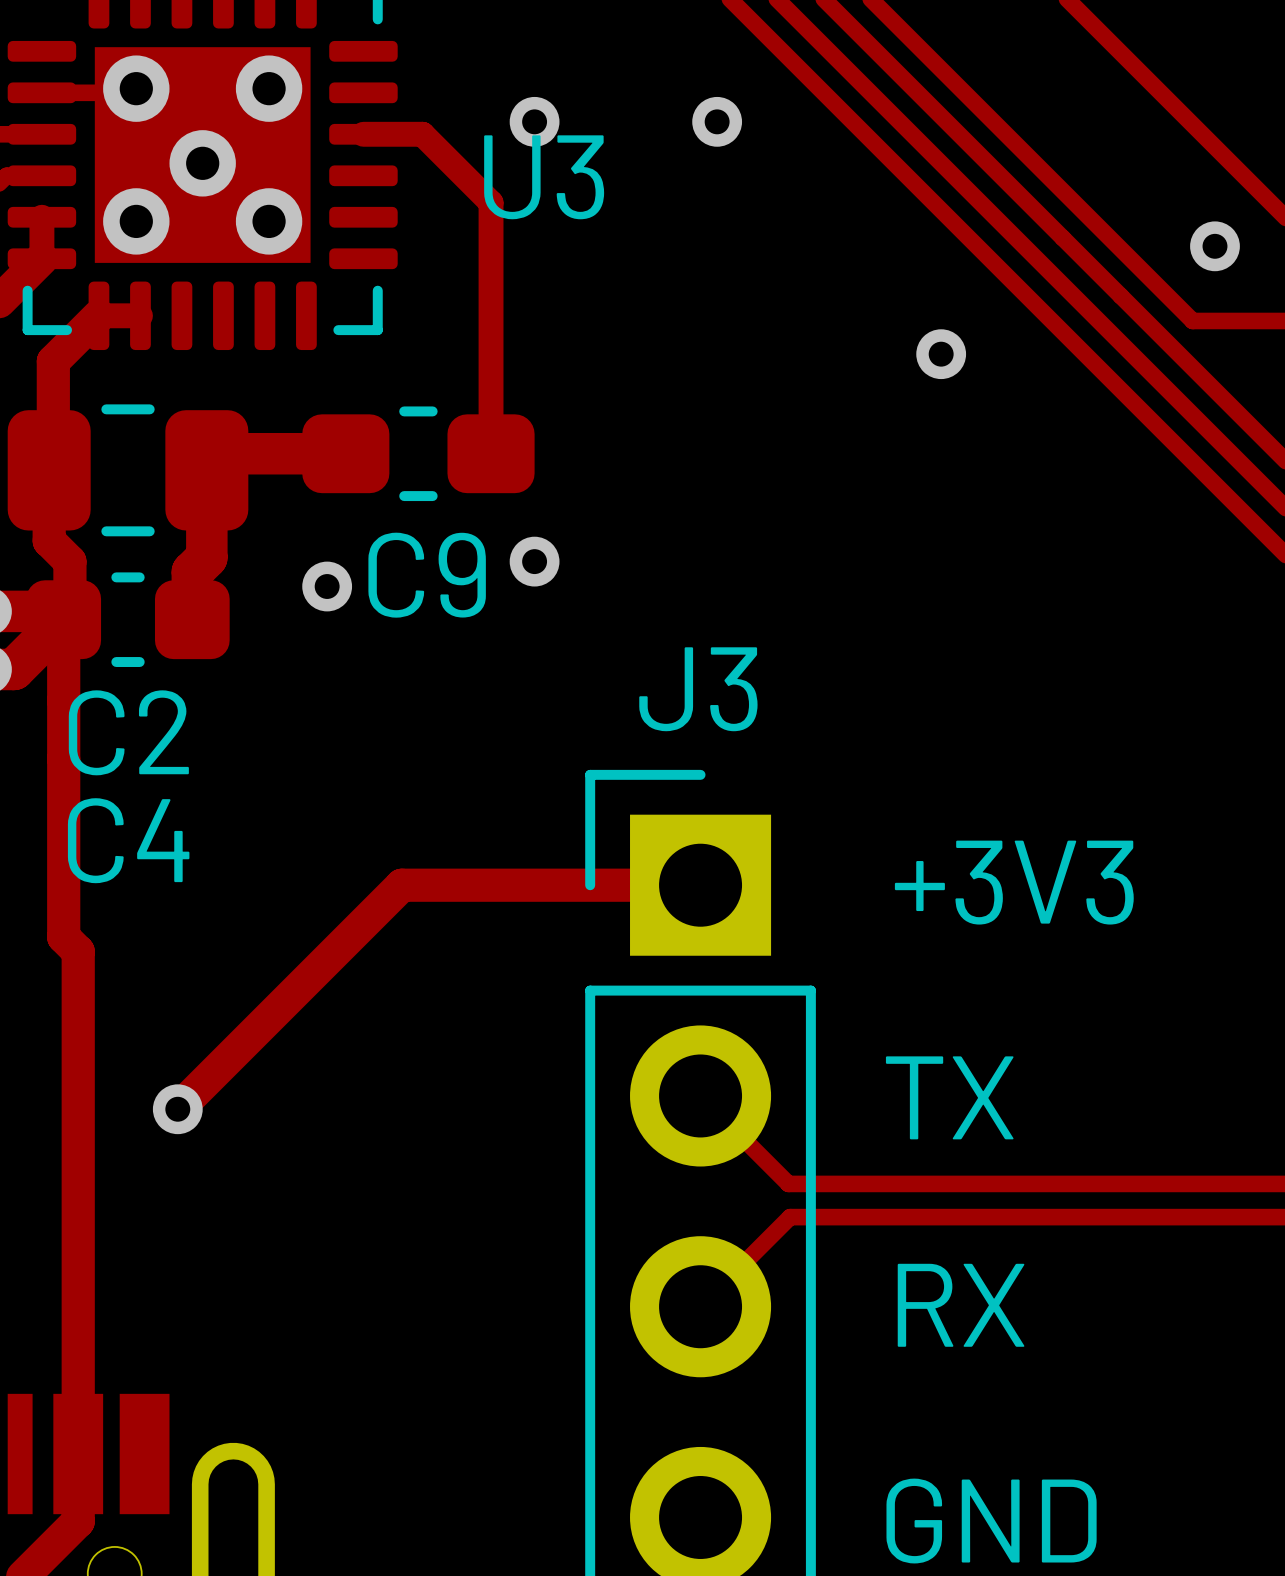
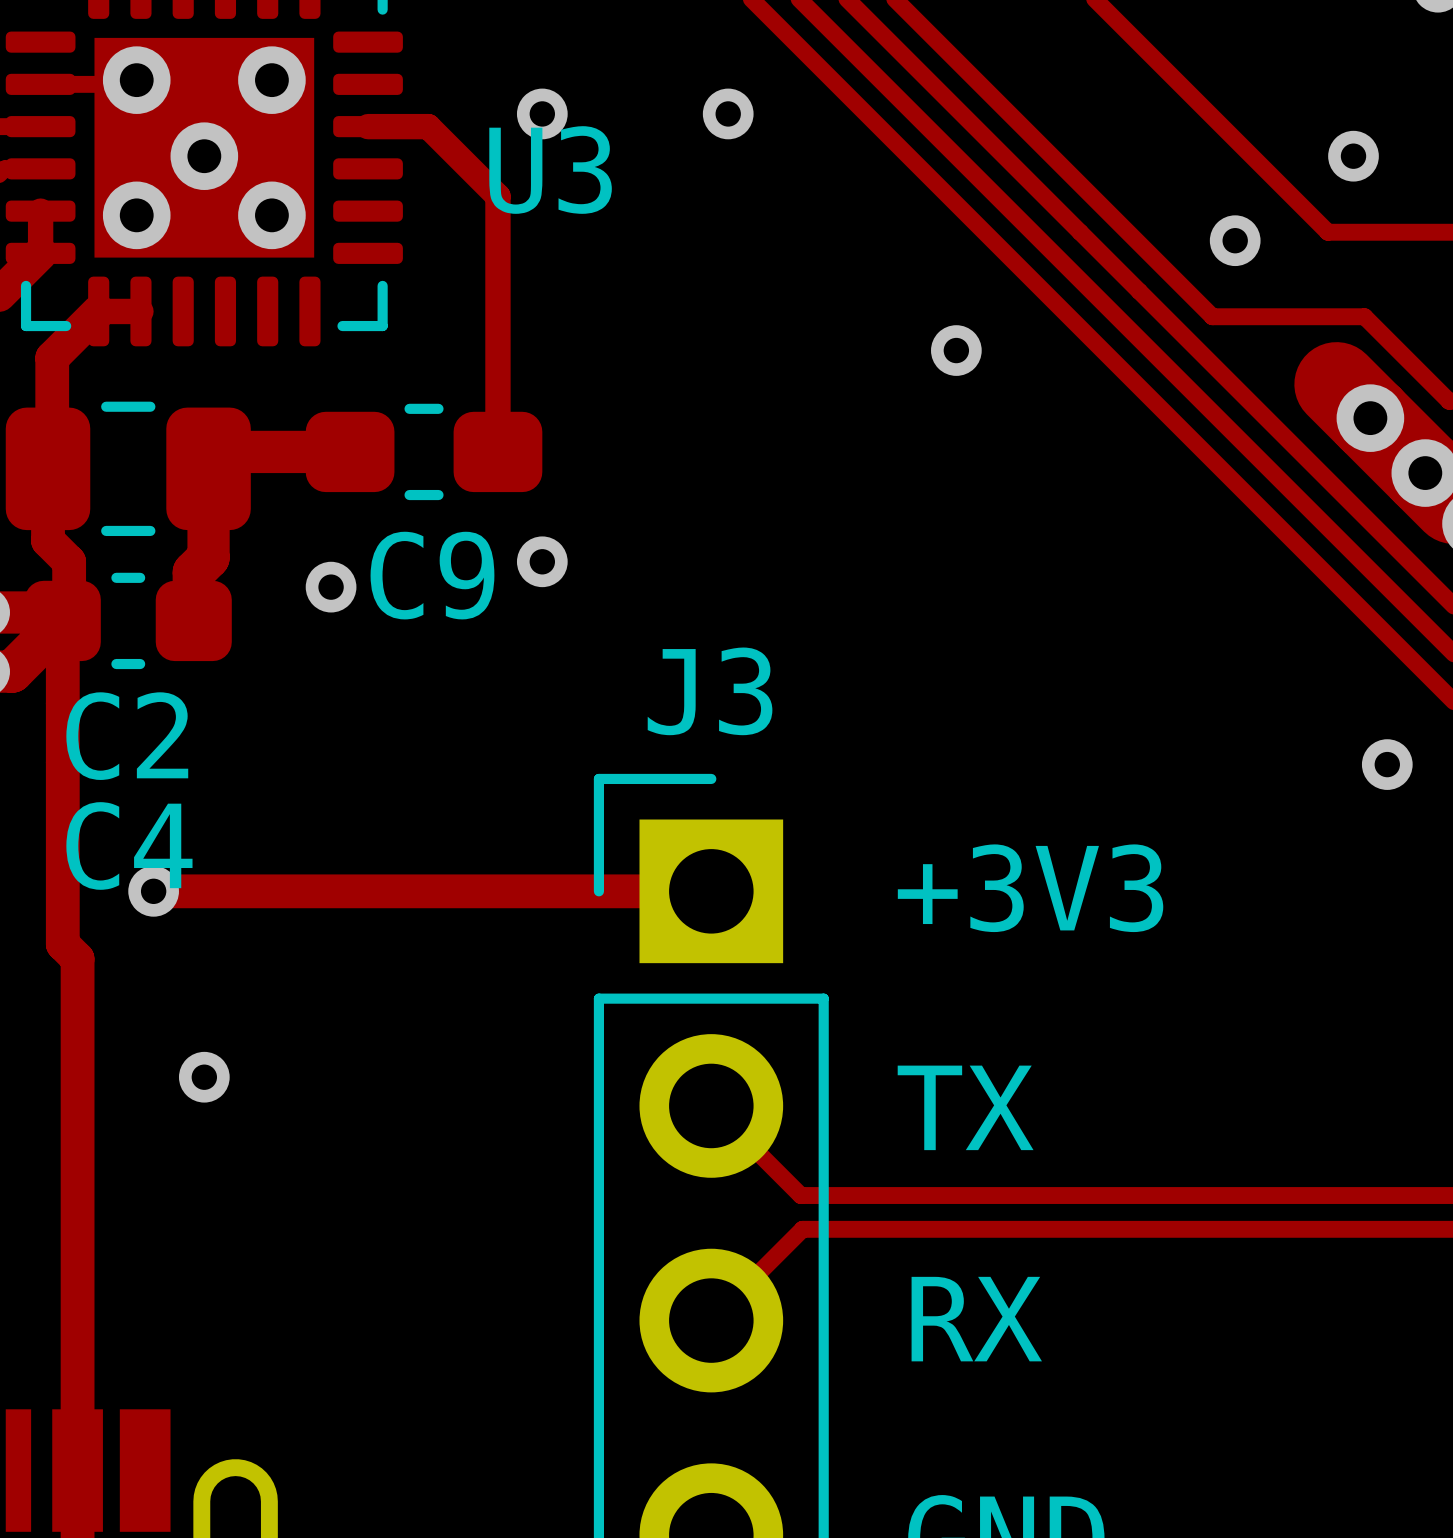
via: none -> (153, 891)
track: (401, 885) (177, 1109) -> (407, 891) (153, 891)
via position: (177, 1109) -> (204, 1077)

